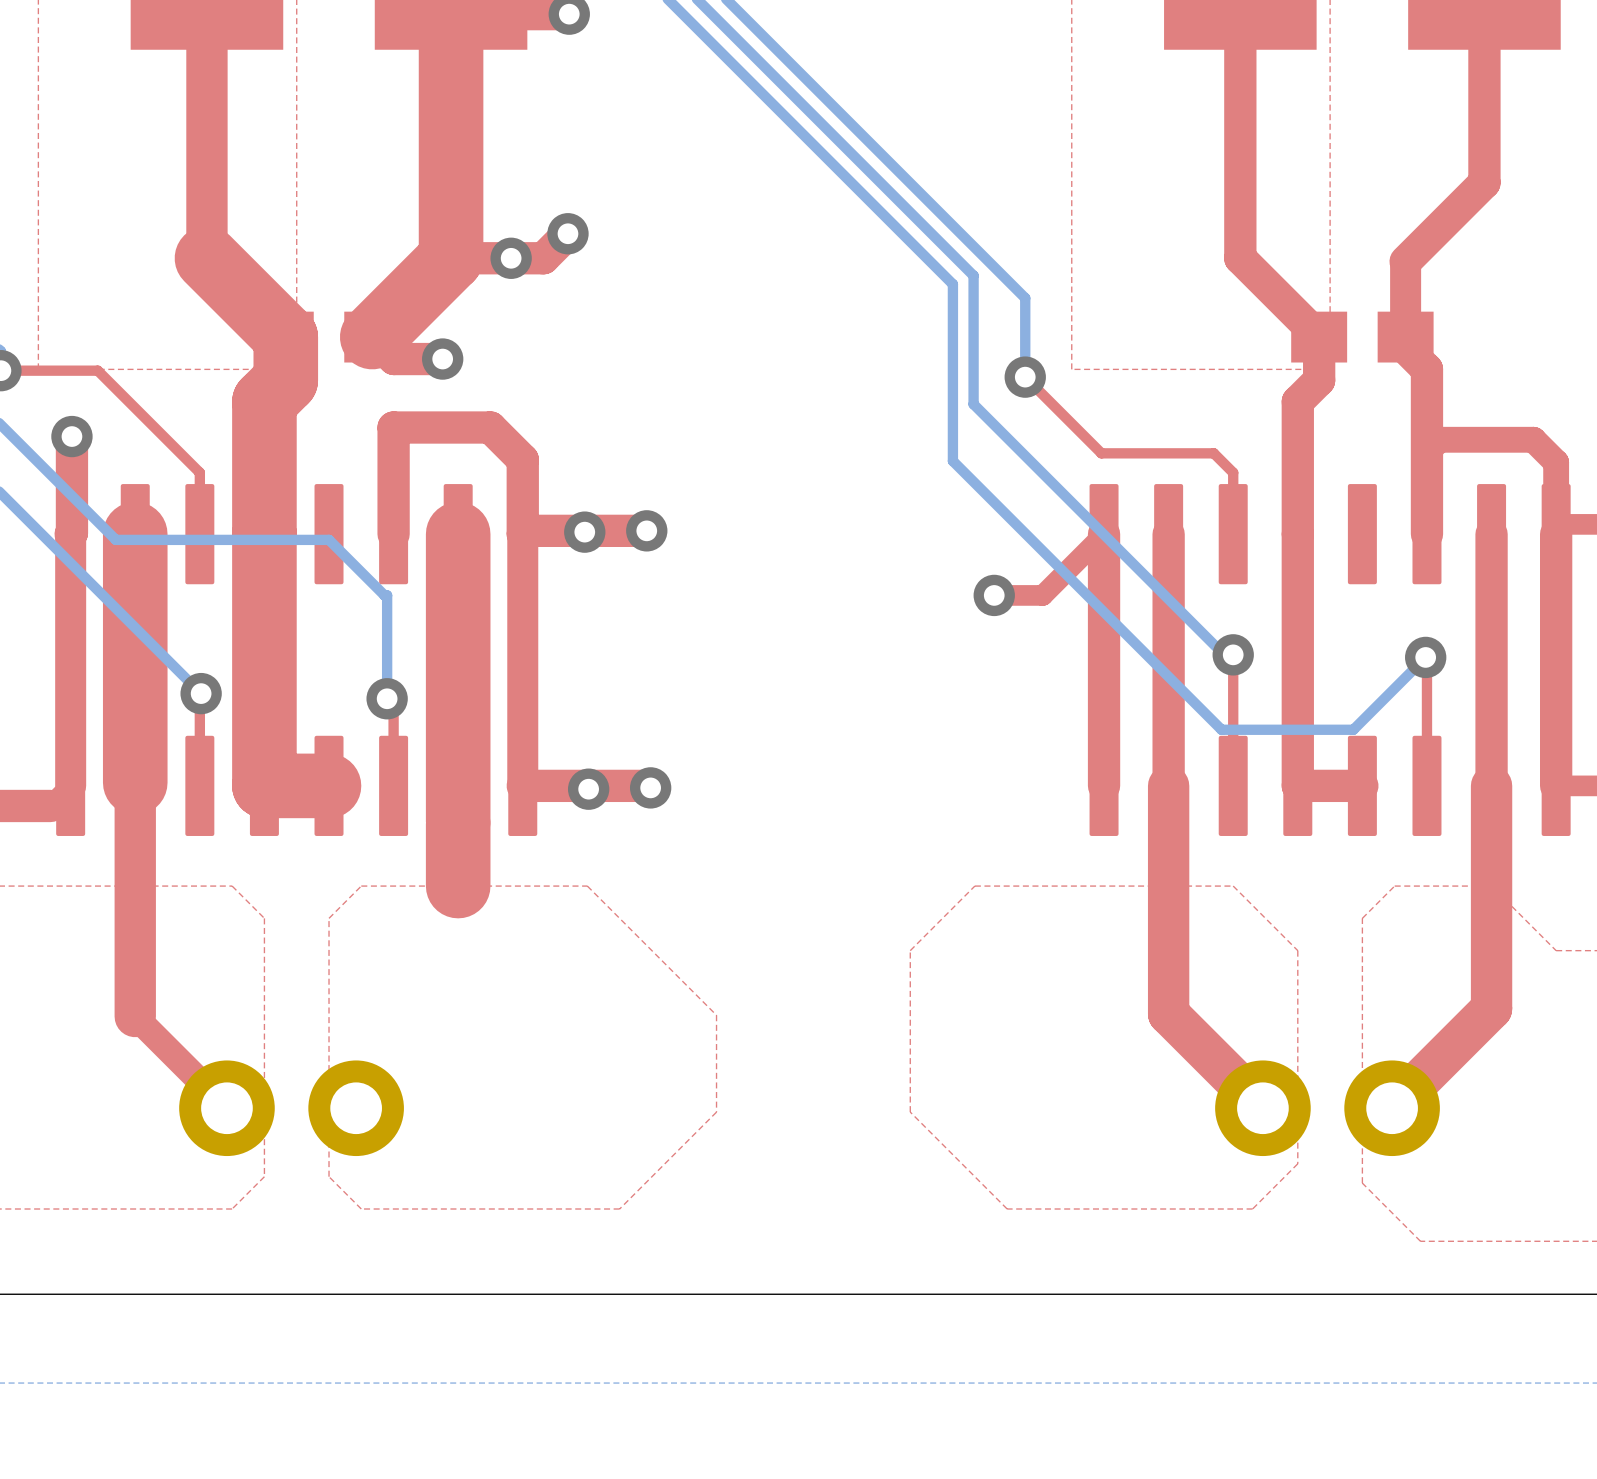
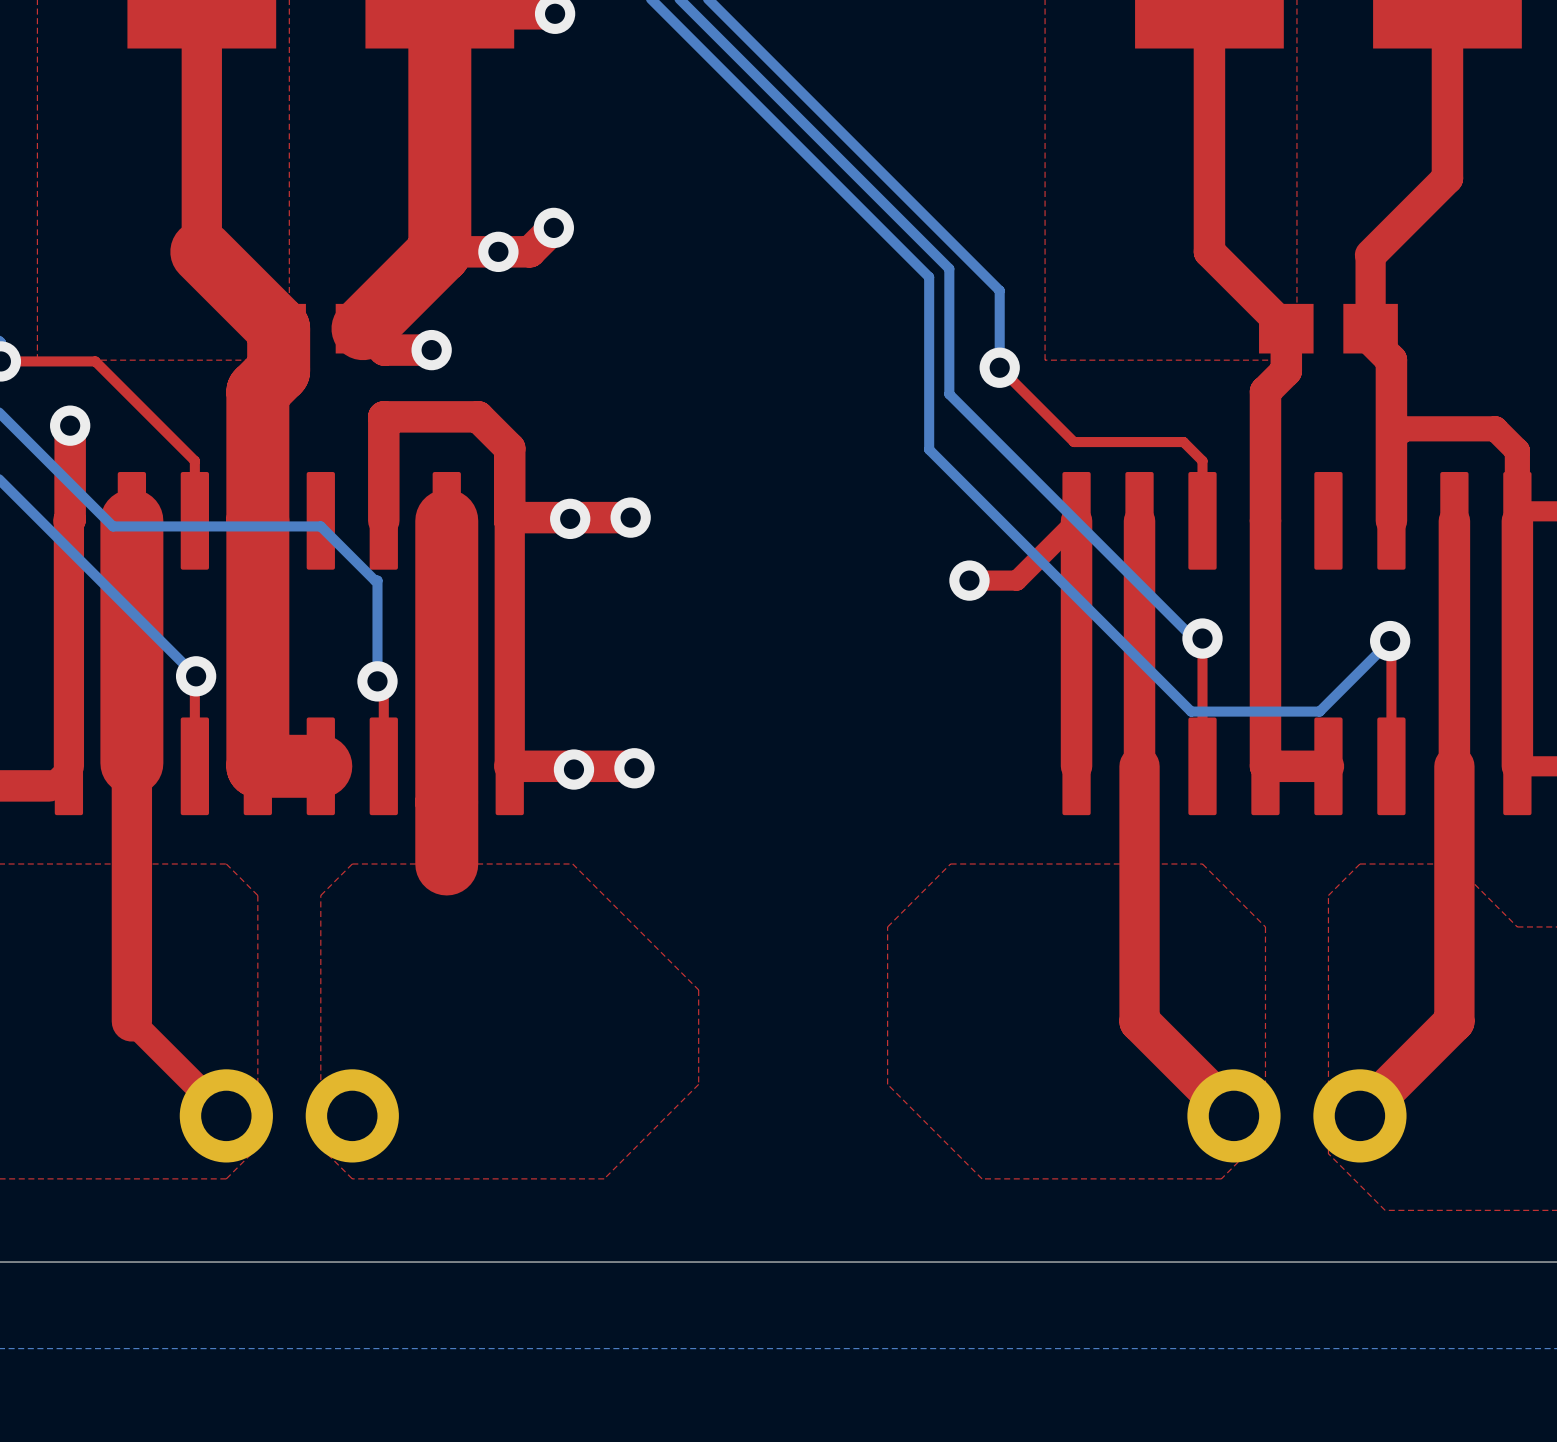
top track: (1491, 1008) (1392, 1108) -> (1454, 983) (1454, 1021) (1359, 1115)
top track: (1168, 1013) (1262, 1108) -> (1139, 988) (1139, 1021) (1233, 1115)
top track: (135, 1016) (226, 1108) -> (131, 991) (131, 1021) (226, 1115)
part position: (291, 1108) -> (289, 1115)
part position: (1327, 1108) -> (1296, 1115)

